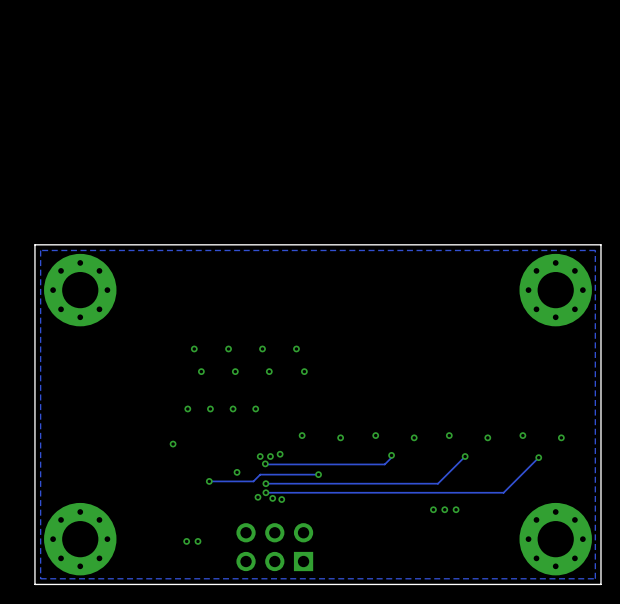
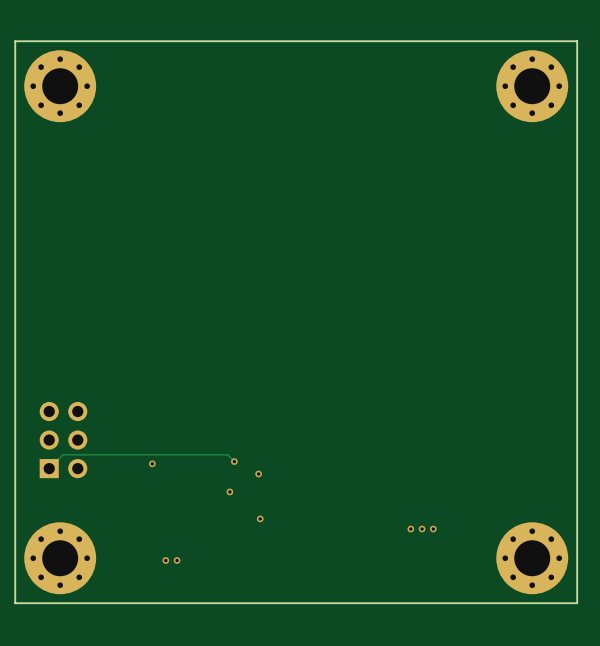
board edge: (600, 244) (34, 244) -> (577, 266) (577, 41) (15, 41) (15, 266)
zone outline: (595, 250) (40, 250) (40, 578) (595, 578) (595, 250) -> none
part position: (80, 290) -> (60, 86)
part position: (555, 290) -> (532, 86)
via: (194, 348) -> none
via: (228, 348) -> none
via: (262, 348) -> none
via: (296, 348) -> none
via: (201, 371) -> none
via: (235, 371) -> none
via: (269, 371) -> none
via: (304, 371) -> none
via: (187, 408) -> none
via: (210, 408) -> none
via: (233, 408) -> none
via: (255, 408) -> none
via: (302, 435) -> none
via: (375, 435) -> none
via: (449, 435) -> none
via: (522, 435) -> none
via: (340, 437) -> none
via: (414, 437) -> none
via: (487, 437) -> none
via: (561, 437) -> none
track: none -> (234, 461) (227, 454) (62, 454) (49, 468)
via: none -> (234, 461)
track: (391, 455) (384, 464) (265, 463) -> none
via: (391, 455) -> none
via: (260, 456) -> none
via: (270, 456) -> none
track: (465, 456) (437, 483) (265, 483) -> none
via: (465, 456) -> none
track: (538, 457) (503, 492) (265, 492) -> none
via: (538, 457) -> none
via: (265, 463) -> none
via: (237, 472) -> none
via: none -> (229, 491)
track: (318, 474) (260, 474) (253, 481) (209, 481) -> none
via: (318, 474) -> none
via: (209, 481) -> none
via: (265, 483) -> none
via: (265, 492) -> none
via: (257, 497) -> none
via: (272, 498) -> none
part rotation: 0° (274, 547) -> 90° clockwise (63, 440)
part position: (274, 547) -> (63, 440)

